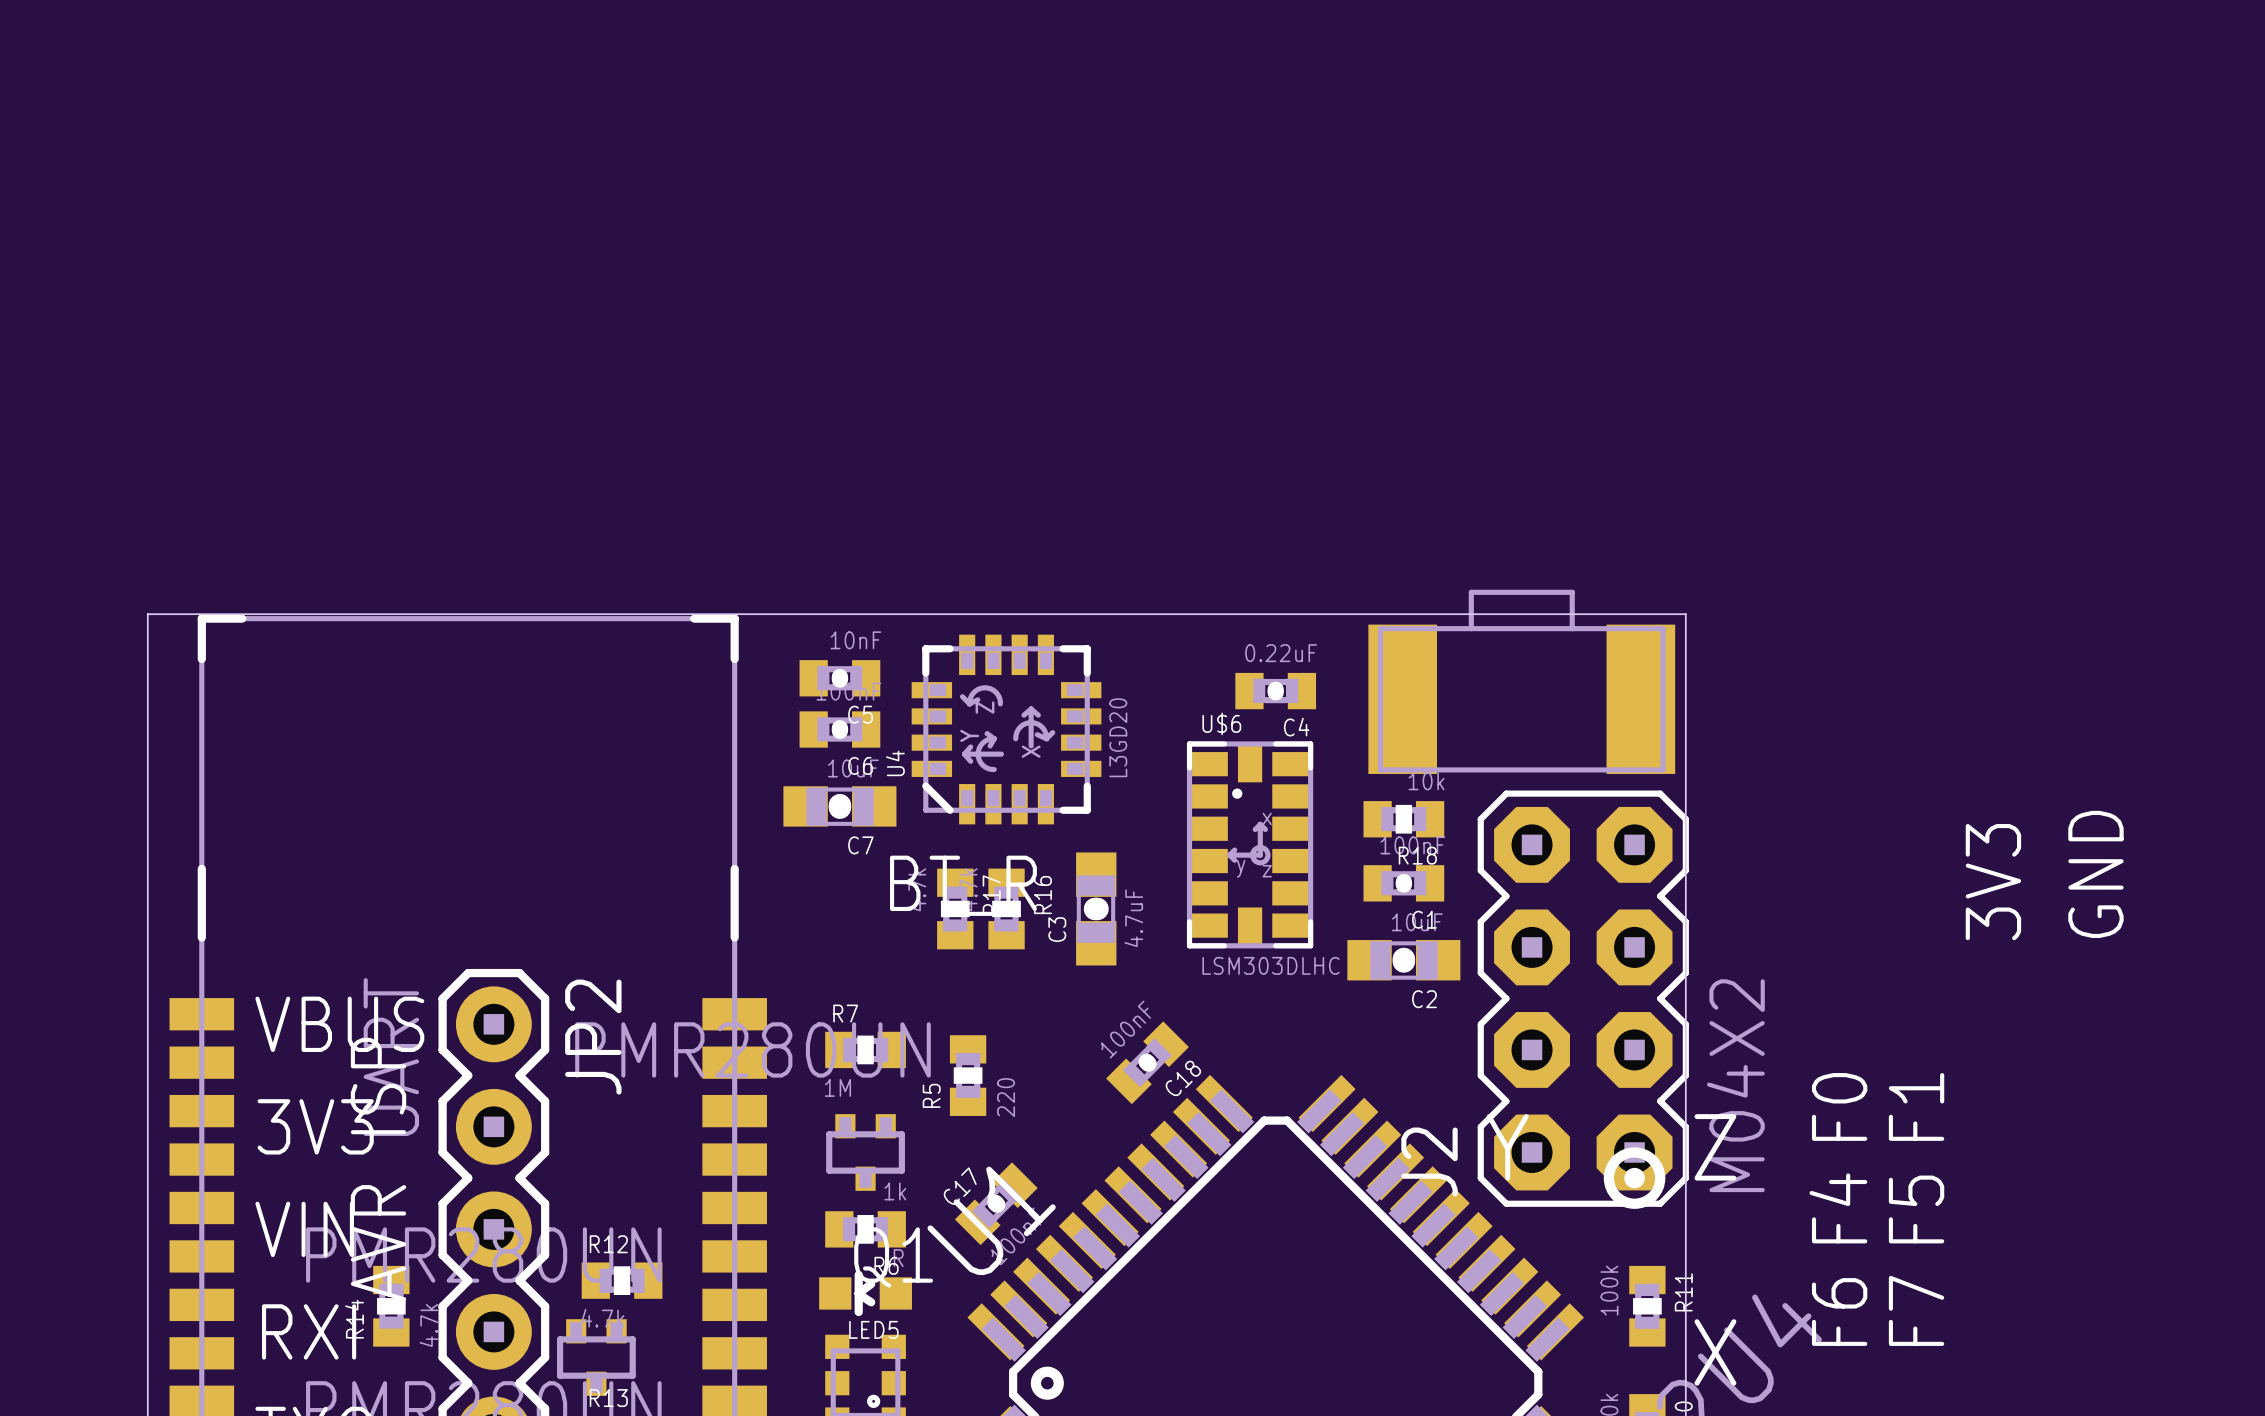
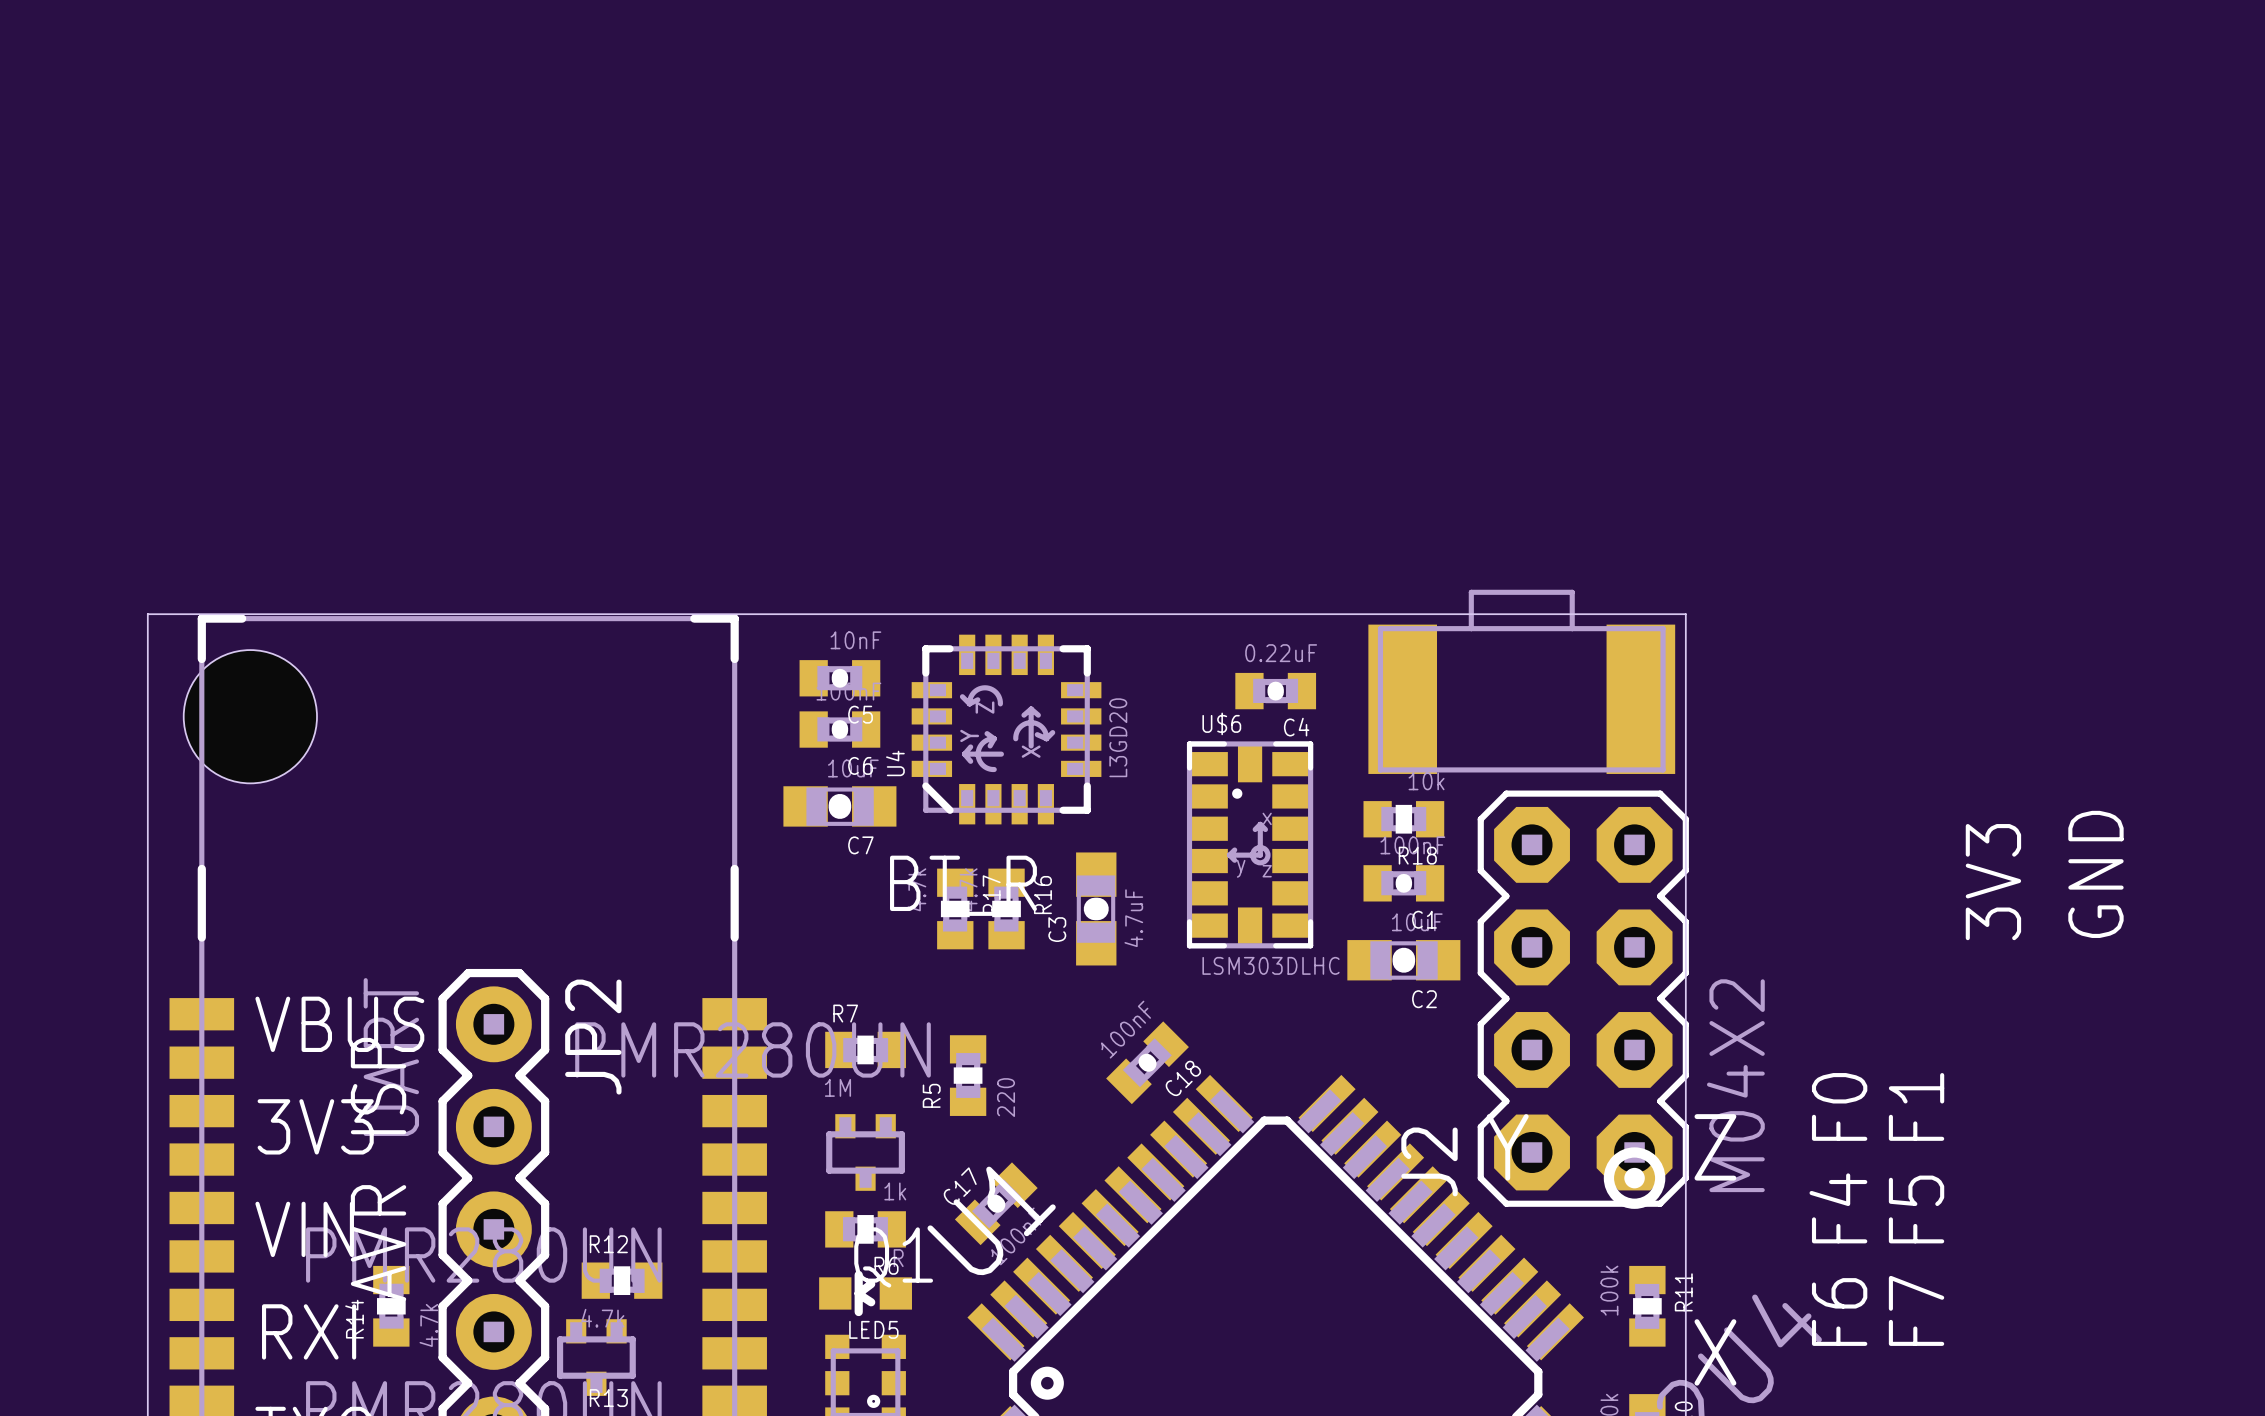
part: none -> (250, 716)

